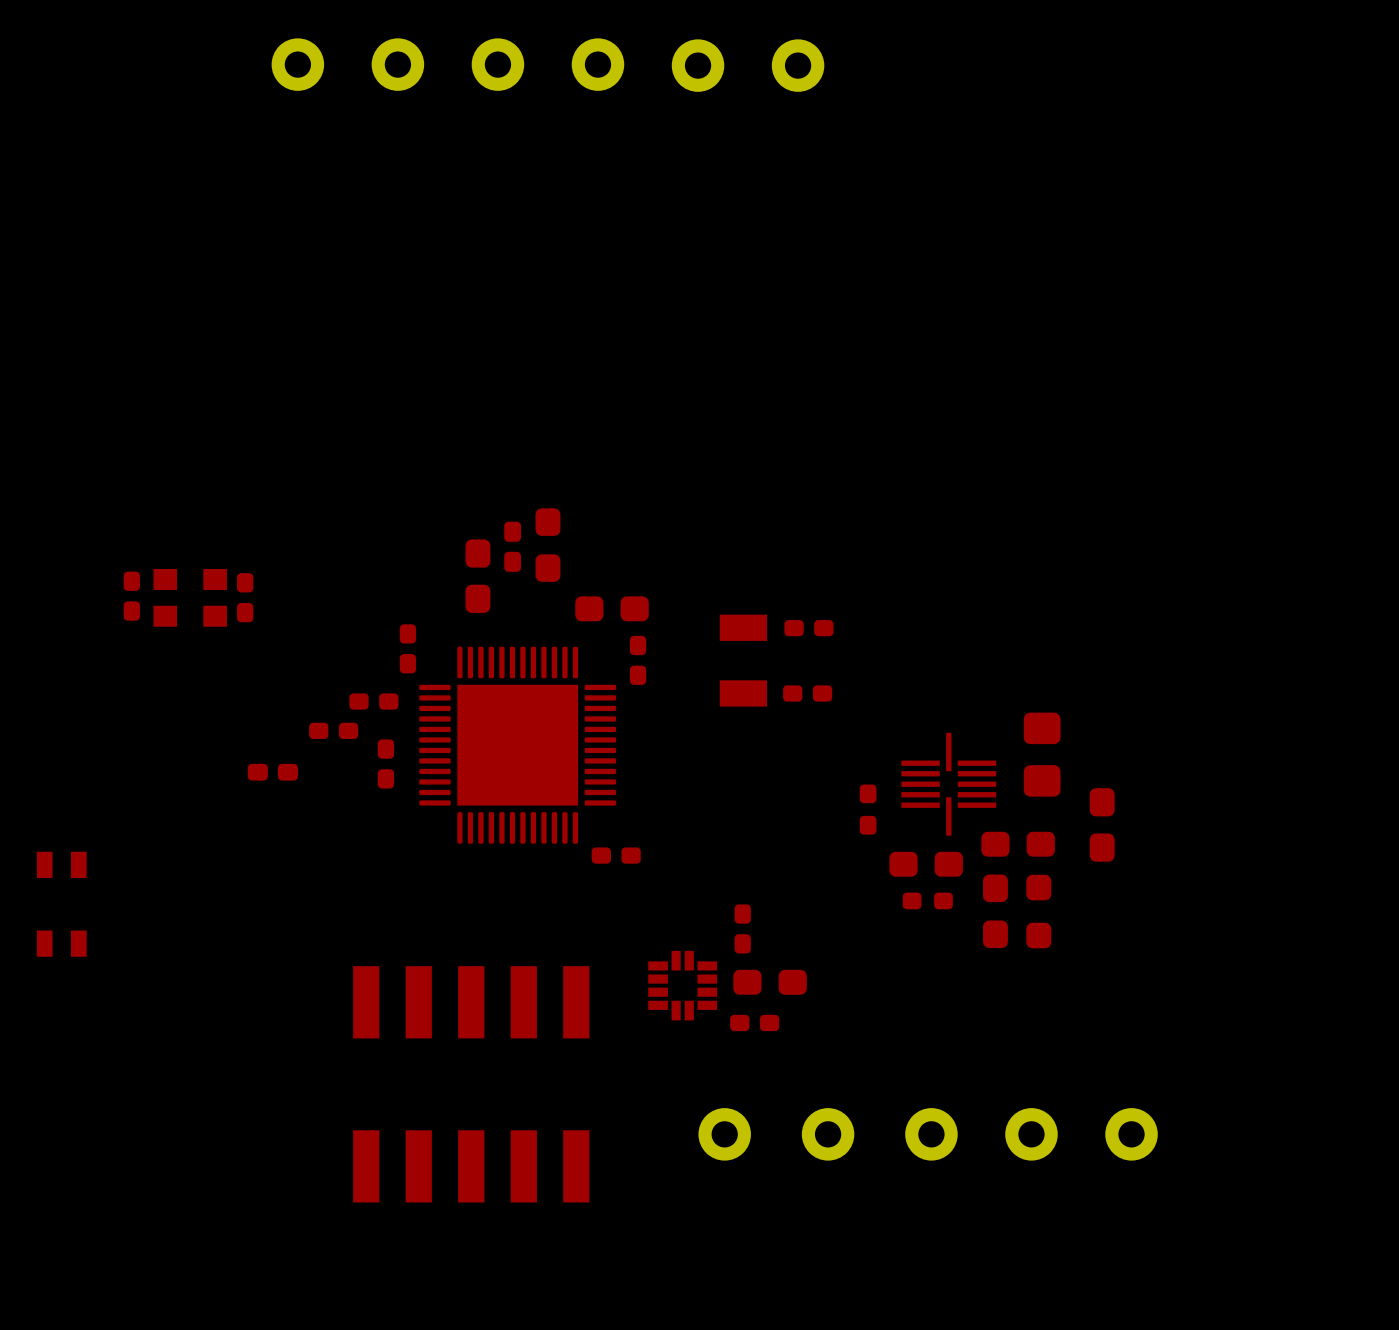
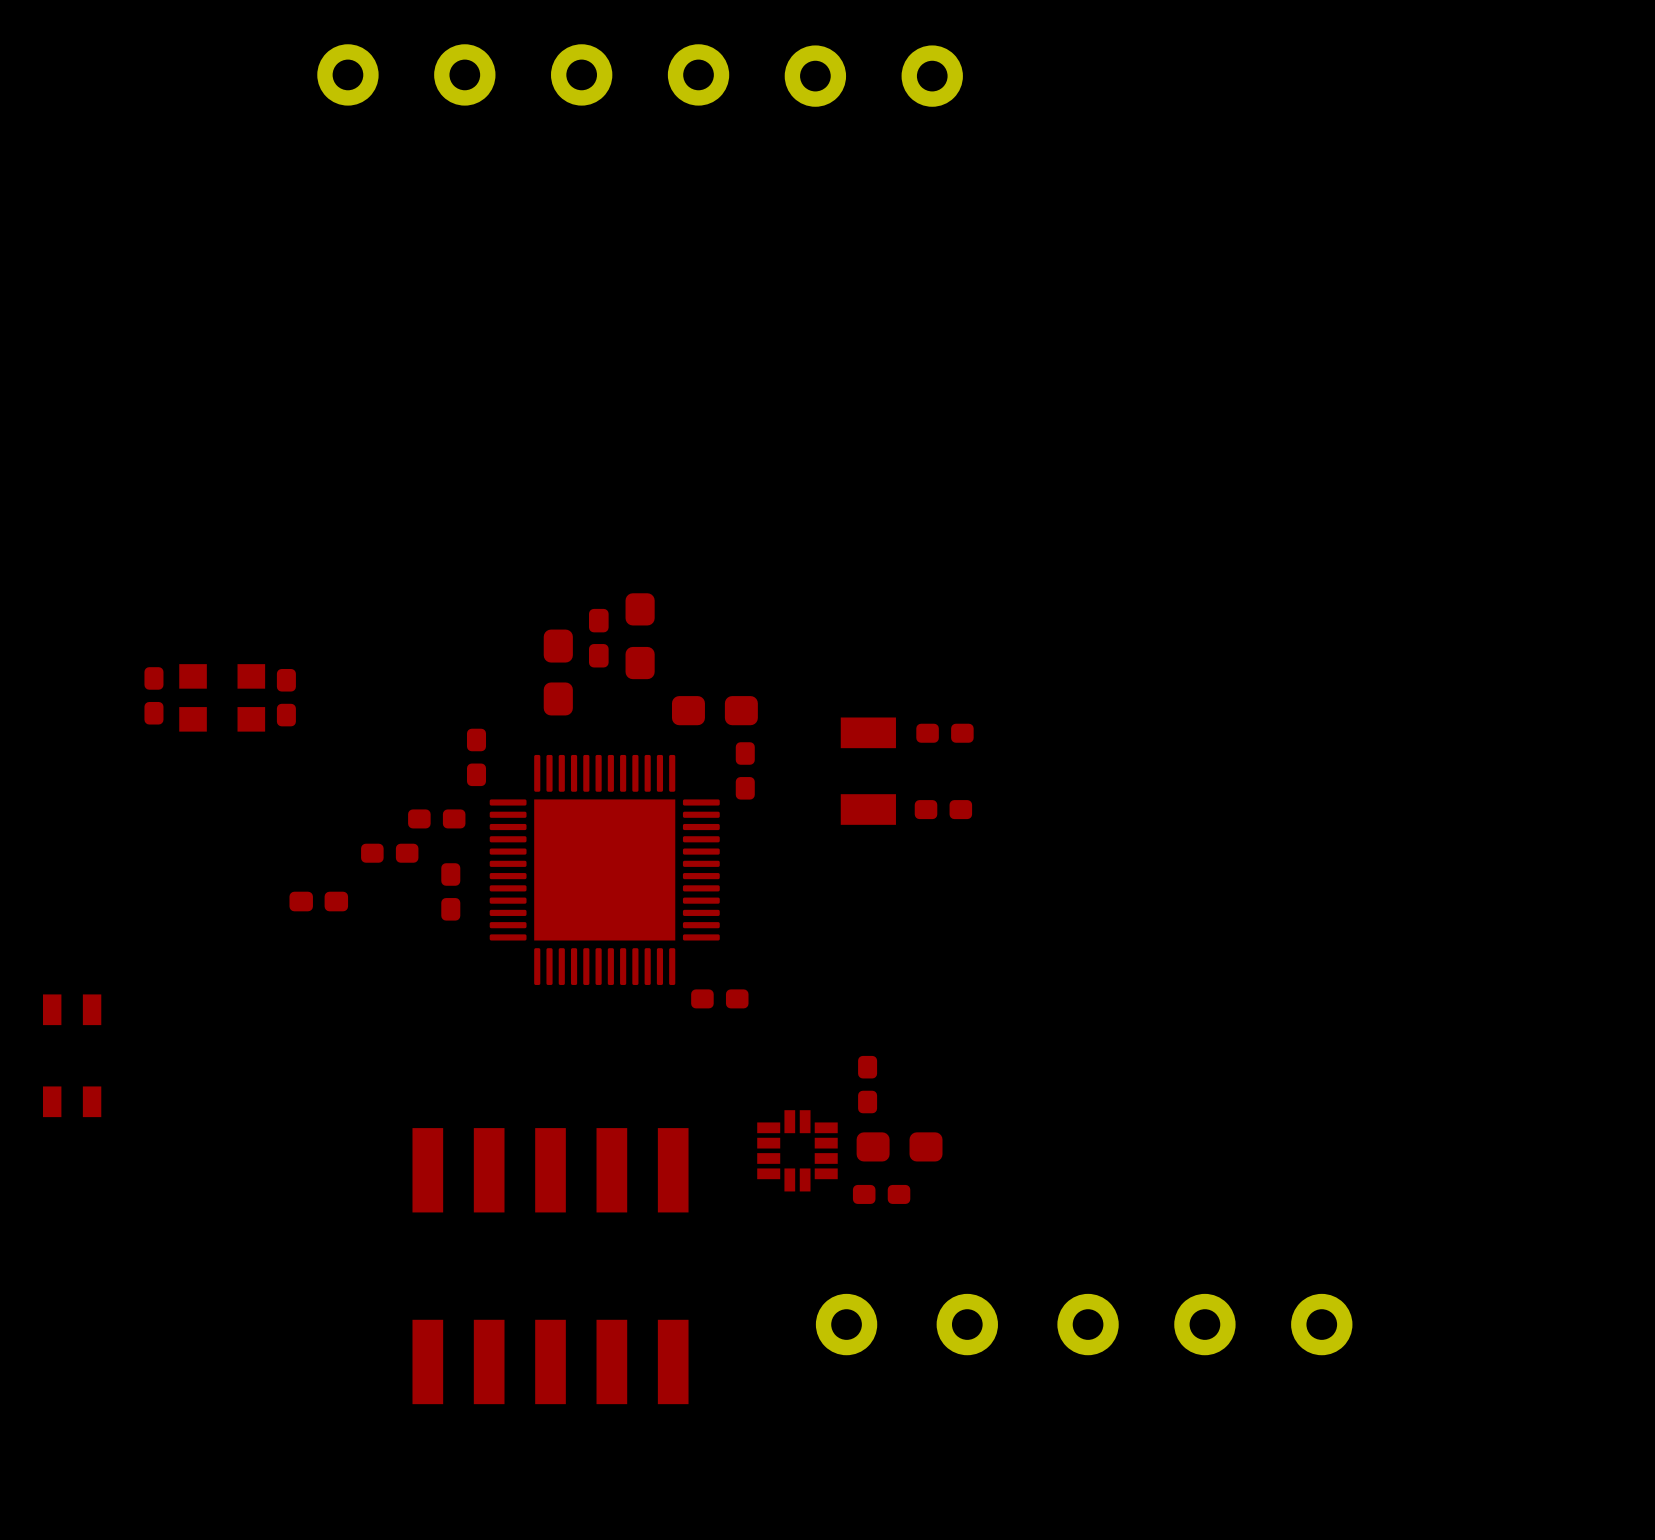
part: (1042, 754) -> none
part: (948, 784) -> none
part: (868, 809) -> none
part: (1102, 824) -> none
part: (1018, 844) -> none
part: (926, 864) -> none
part: (927, 900) -> none
part: (995, 911) -> none
part: (1038, 911) -> none

